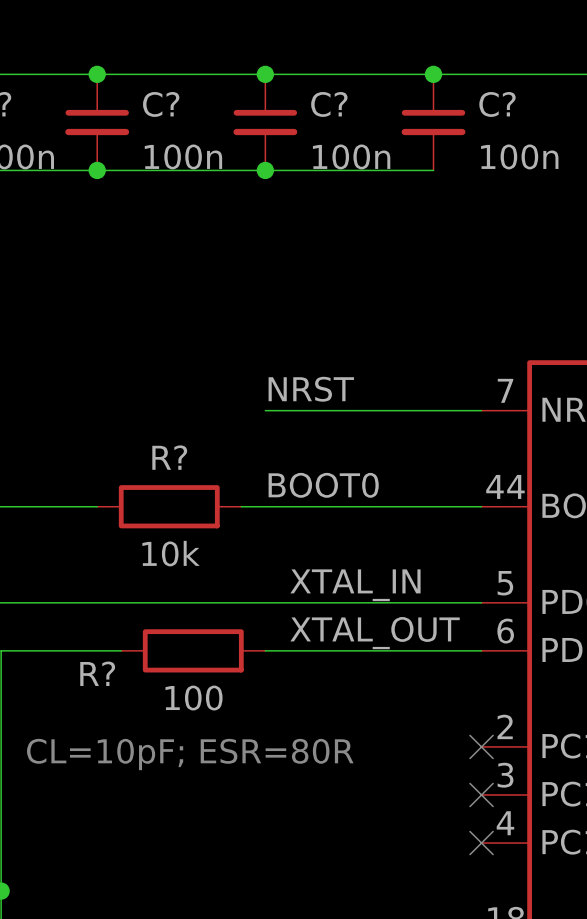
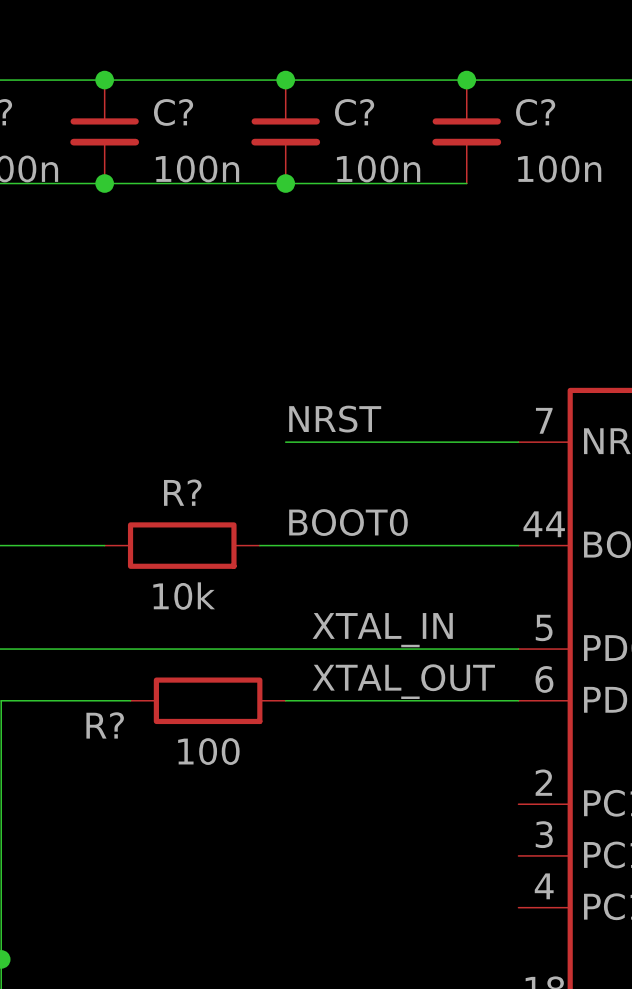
no-connect mark: (481, 746) -> none
text: CL=10pF; ESR=80R (190, 754) -> none
no-connect mark: (481, 795) -> none
no-connect mark: (481, 843) -> none

